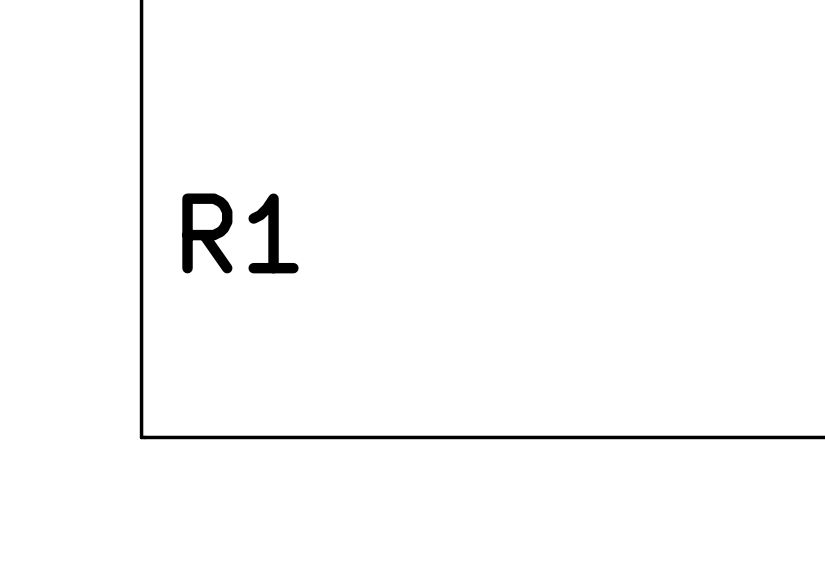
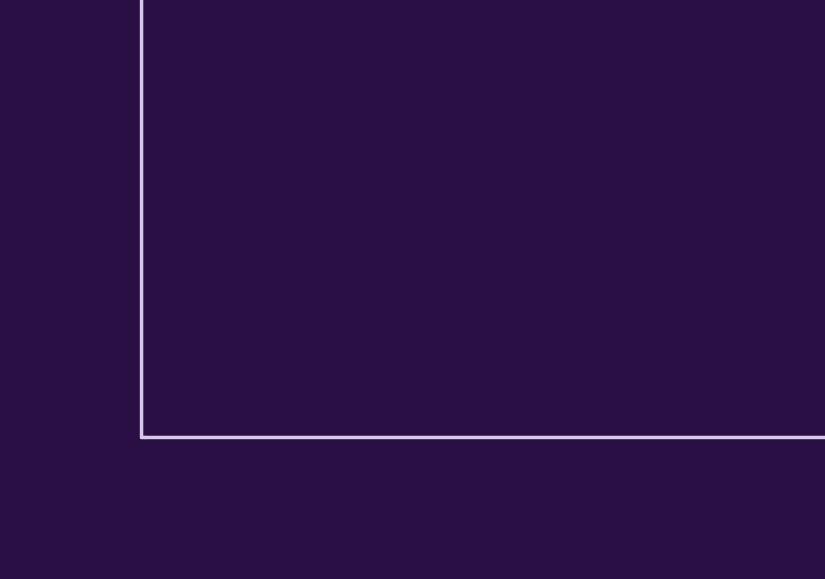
R1: (240, 233) -> none

